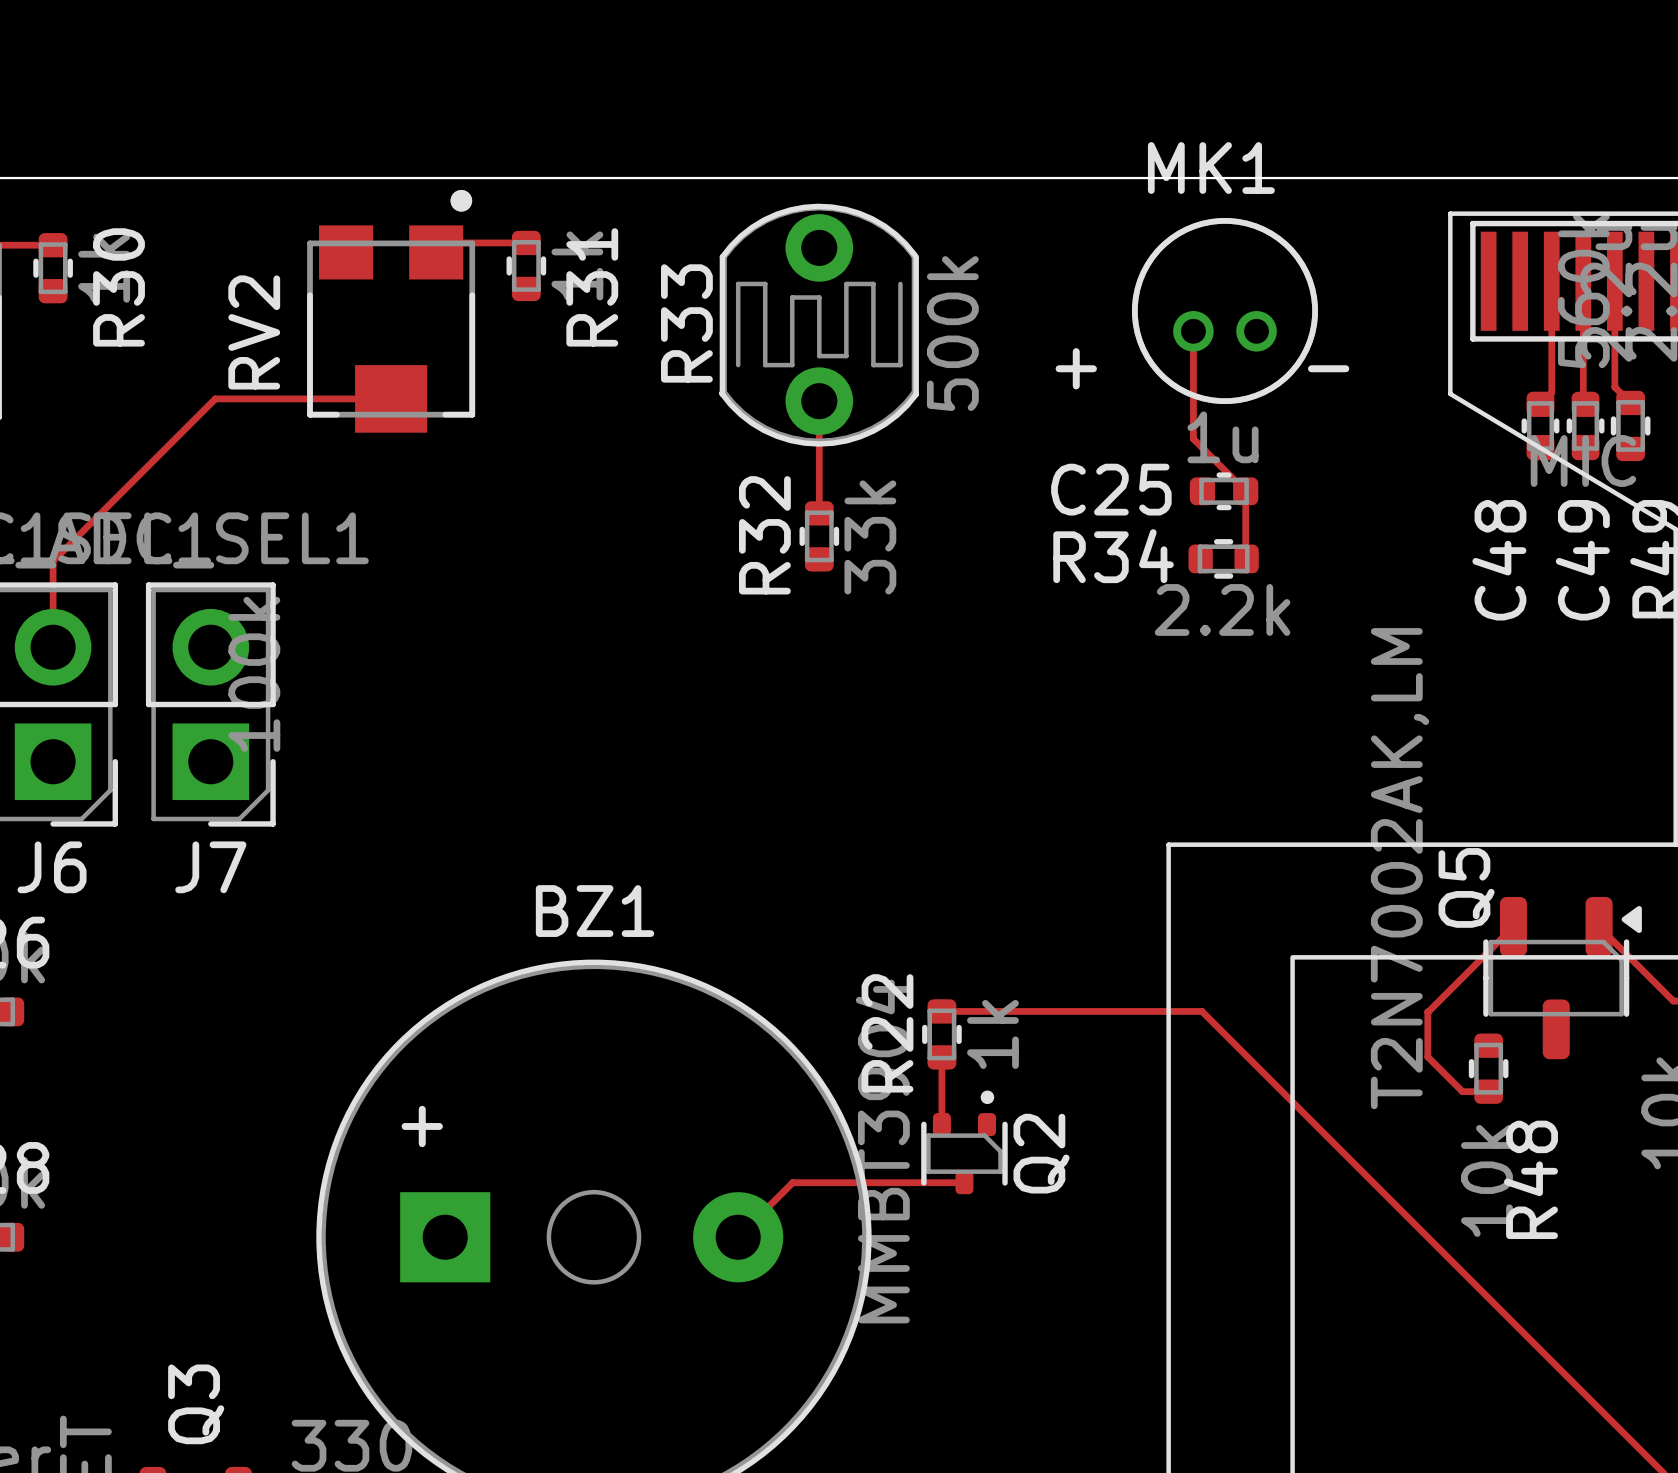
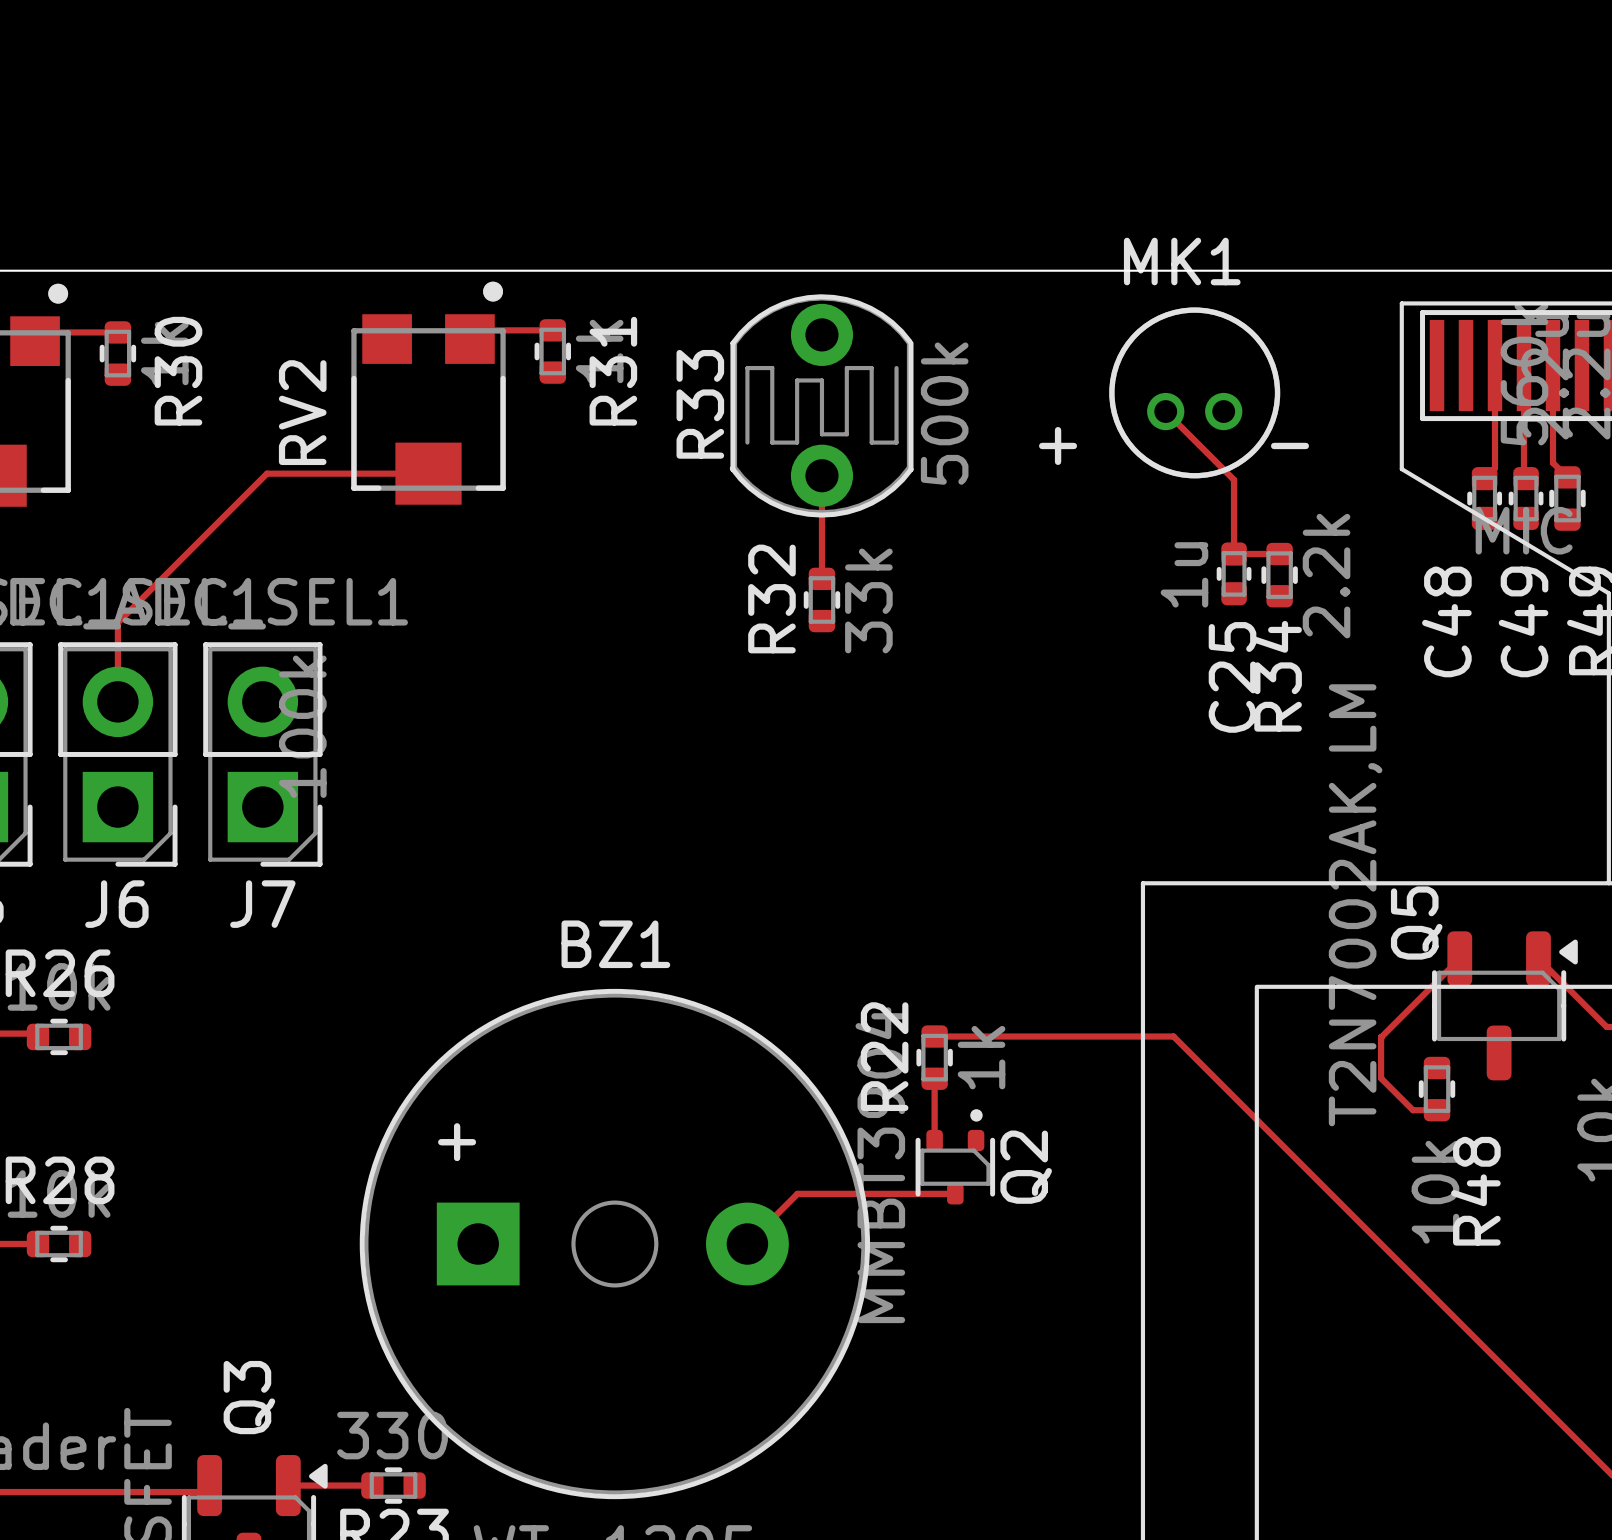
top track: (1193, 331) (1193, 439) (1245, 491) (1246, 558) -> (1165, 411) (1234, 479) (1234, 554) (1279, 554)
C25 name position: C25 (1111, 489) -> C25 (1232, 677)
C25 rotation: 0° (1224, 491) -> 90° clockwise (1234, 573)
C25 position: (1224, 491) -> (1234, 573)
R34 name position: R34 (1113, 556) -> R34 (1277, 676)
R34 rotation: 0° (1223, 558) -> 90° clockwise (1279, 575)
R34 position: (1223, 558) -> (1279, 575)

